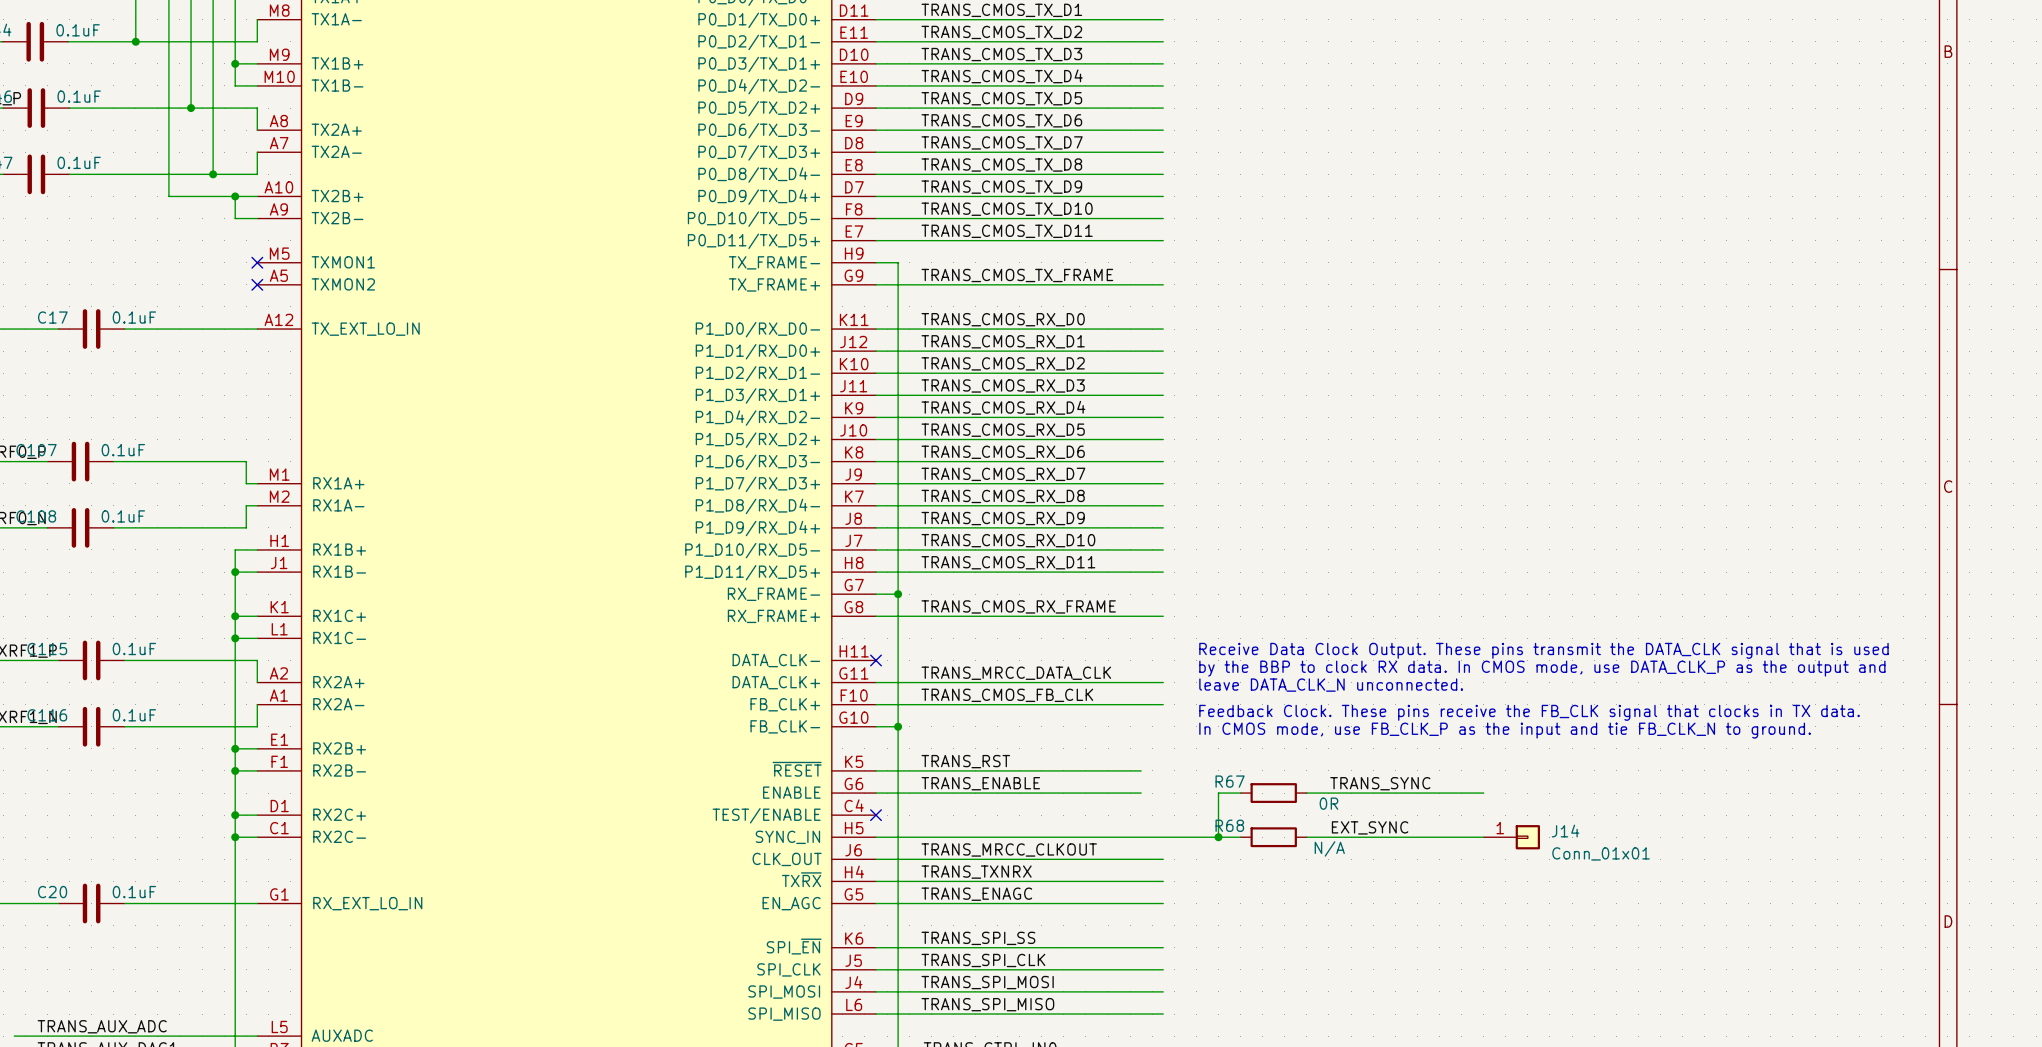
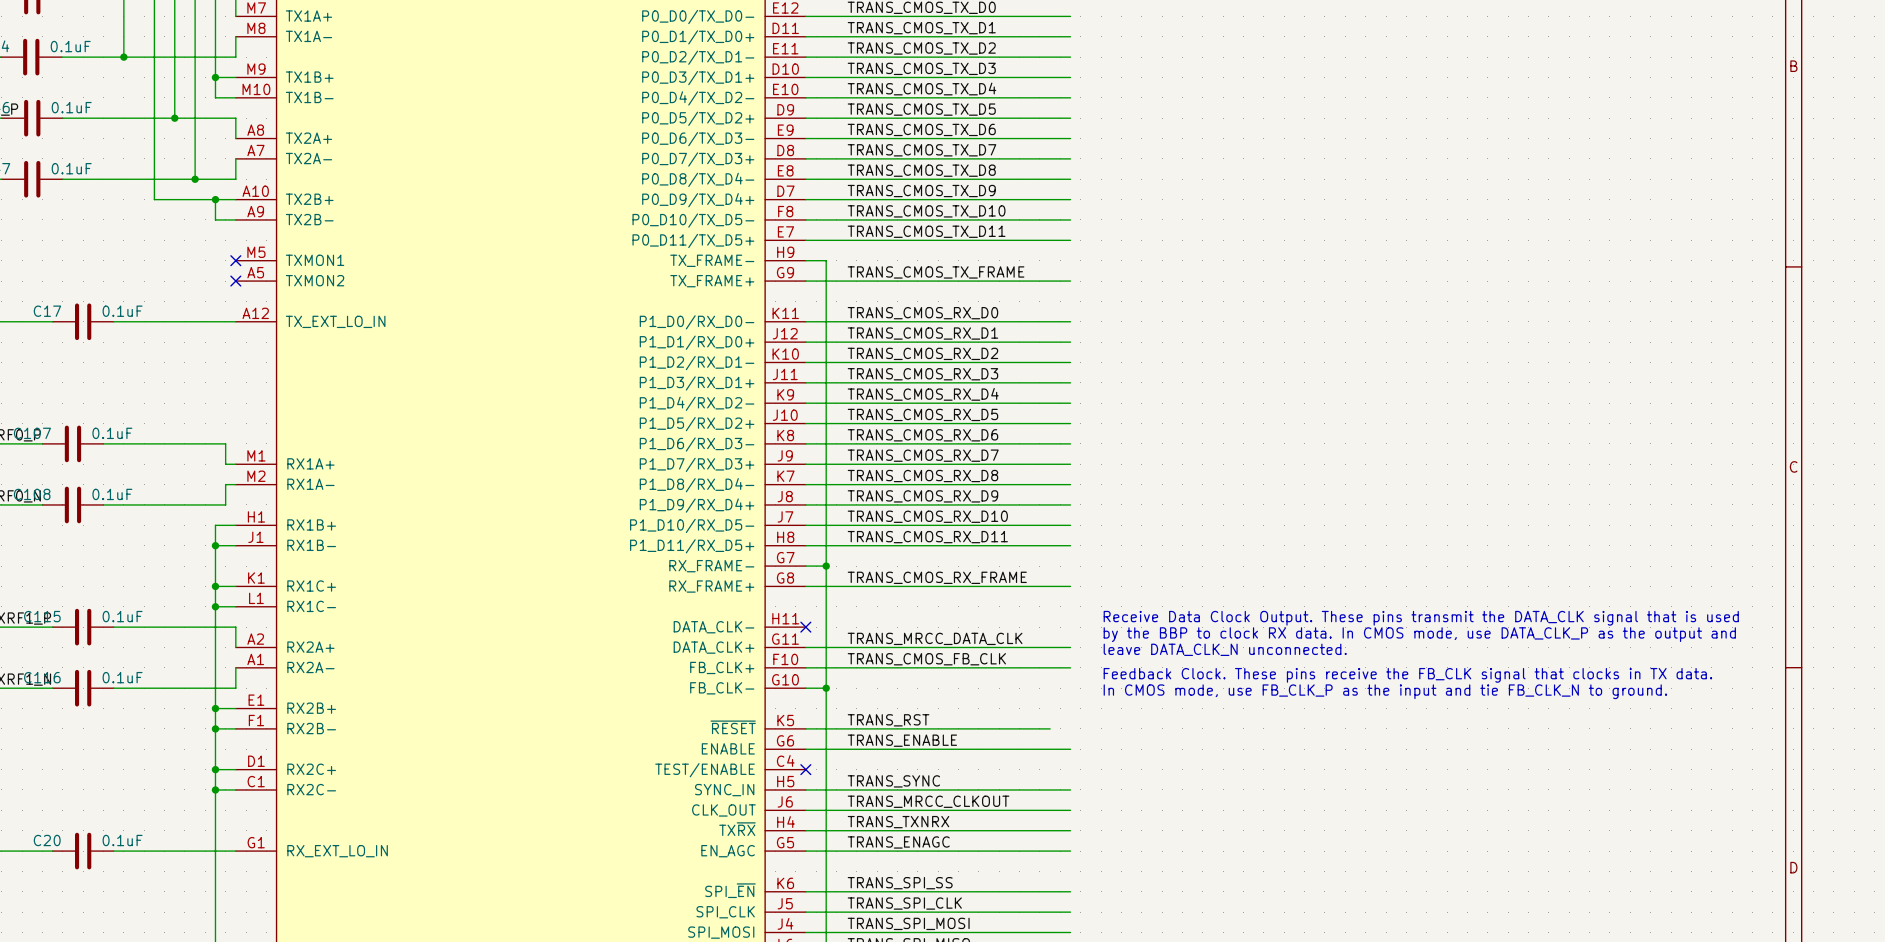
label: TRANS_SYNC (1380, 783) -> none
wire: none -> (1050, 749) (1070, 749)
wire: (1240, 793) (1218, 793) (1218, 837) -> none
R67: 0R (1273, 793) -> none
wire: (1306, 793) (1483, 793) -> none
label: none -> TRANS_SYNC (893, 781)
label: EXT_SYNC (1370, 827) -> none
wire: (1163, 837) (1240, 837) -> none
junction: (1218, 837) -> none
R68: N/A (1273, 837) -> none
wire: (1306, 837) (1483, 837) -> none
J14: Conn_01x01 (1511, 837) -> none

